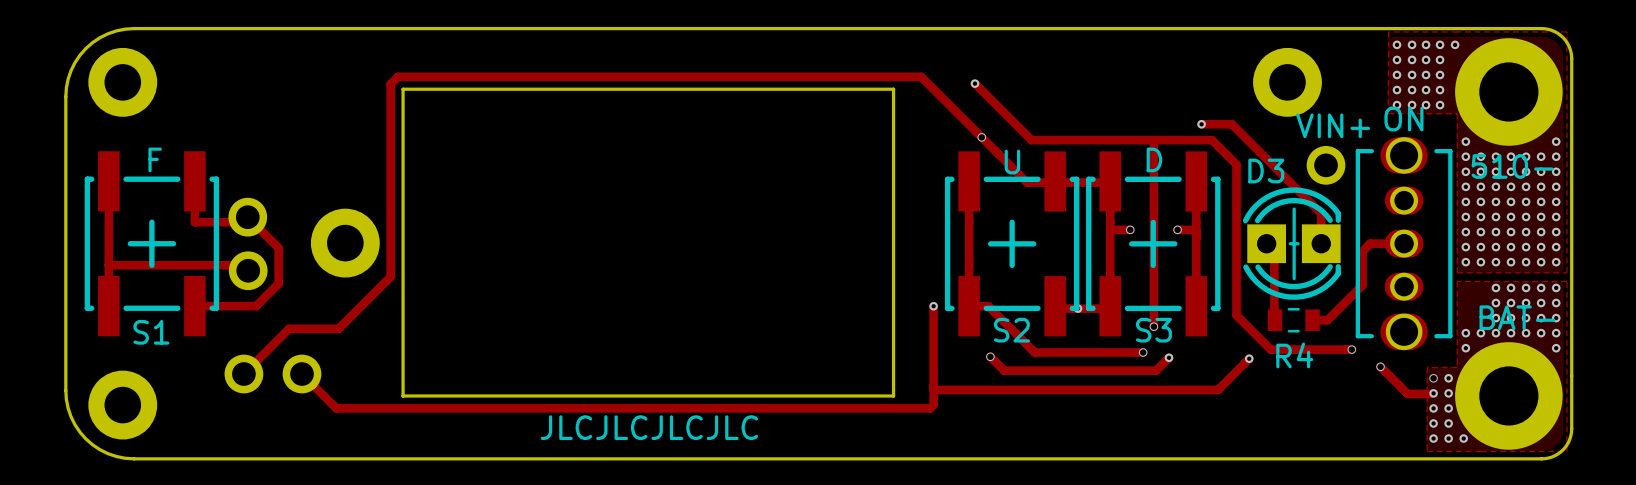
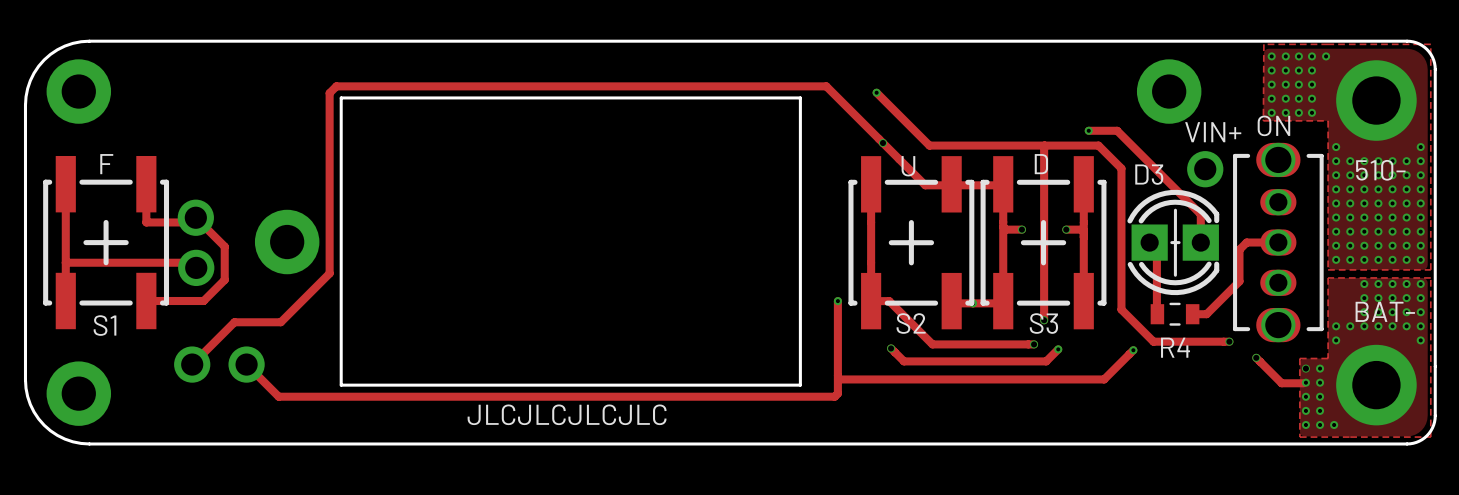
part footprint: [1455, 38, 1563, 146] -> [1336, 60, 1417, 141]
part footprint: [1455, 342, 1563, 450] -> [1336, 344, 1417, 426]

